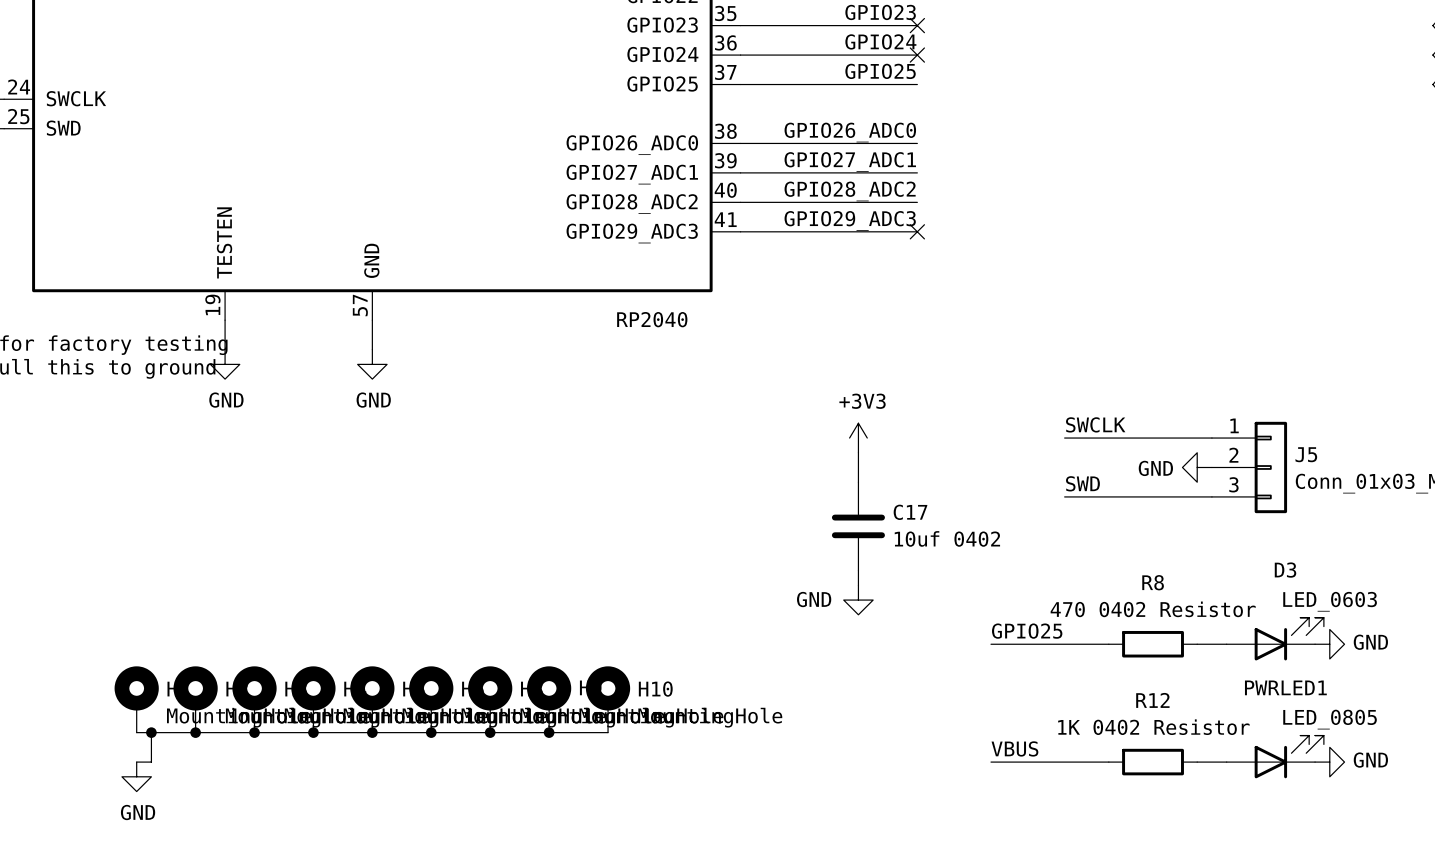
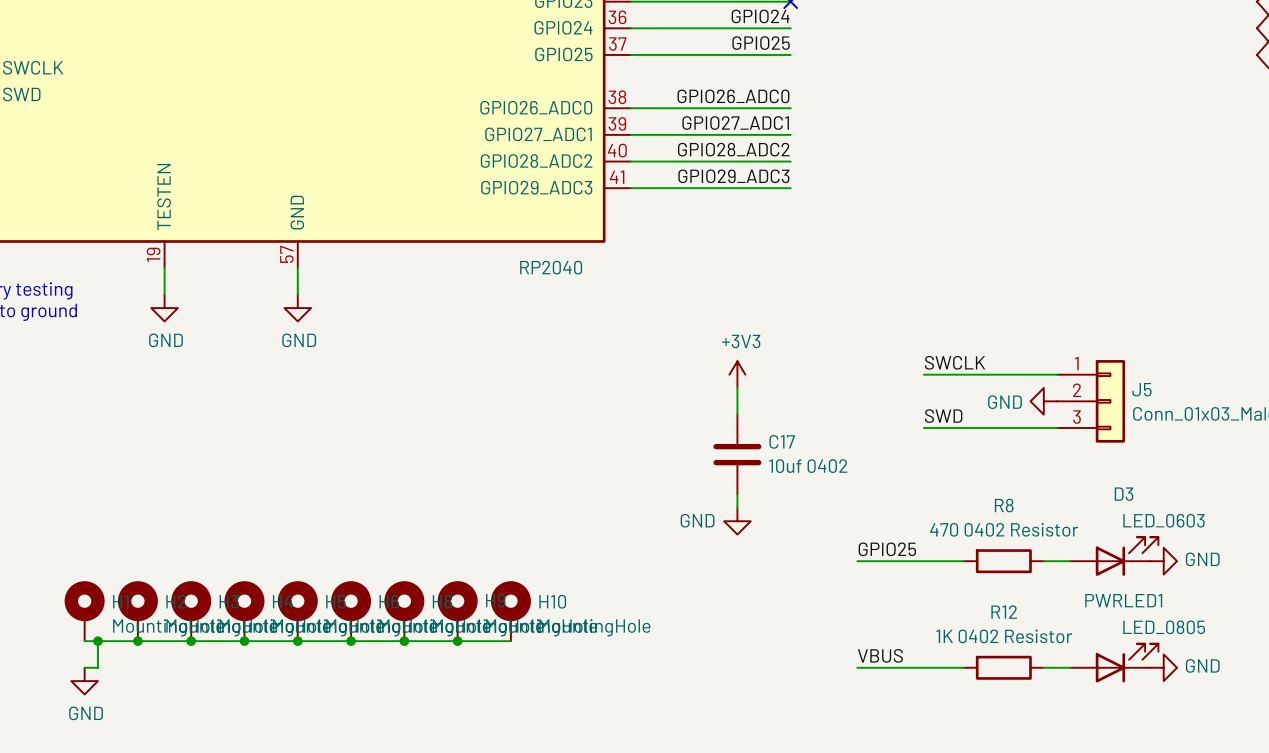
no-connect mark: (917, 55) -> none
no-connect mark: (917, 231) -> none

